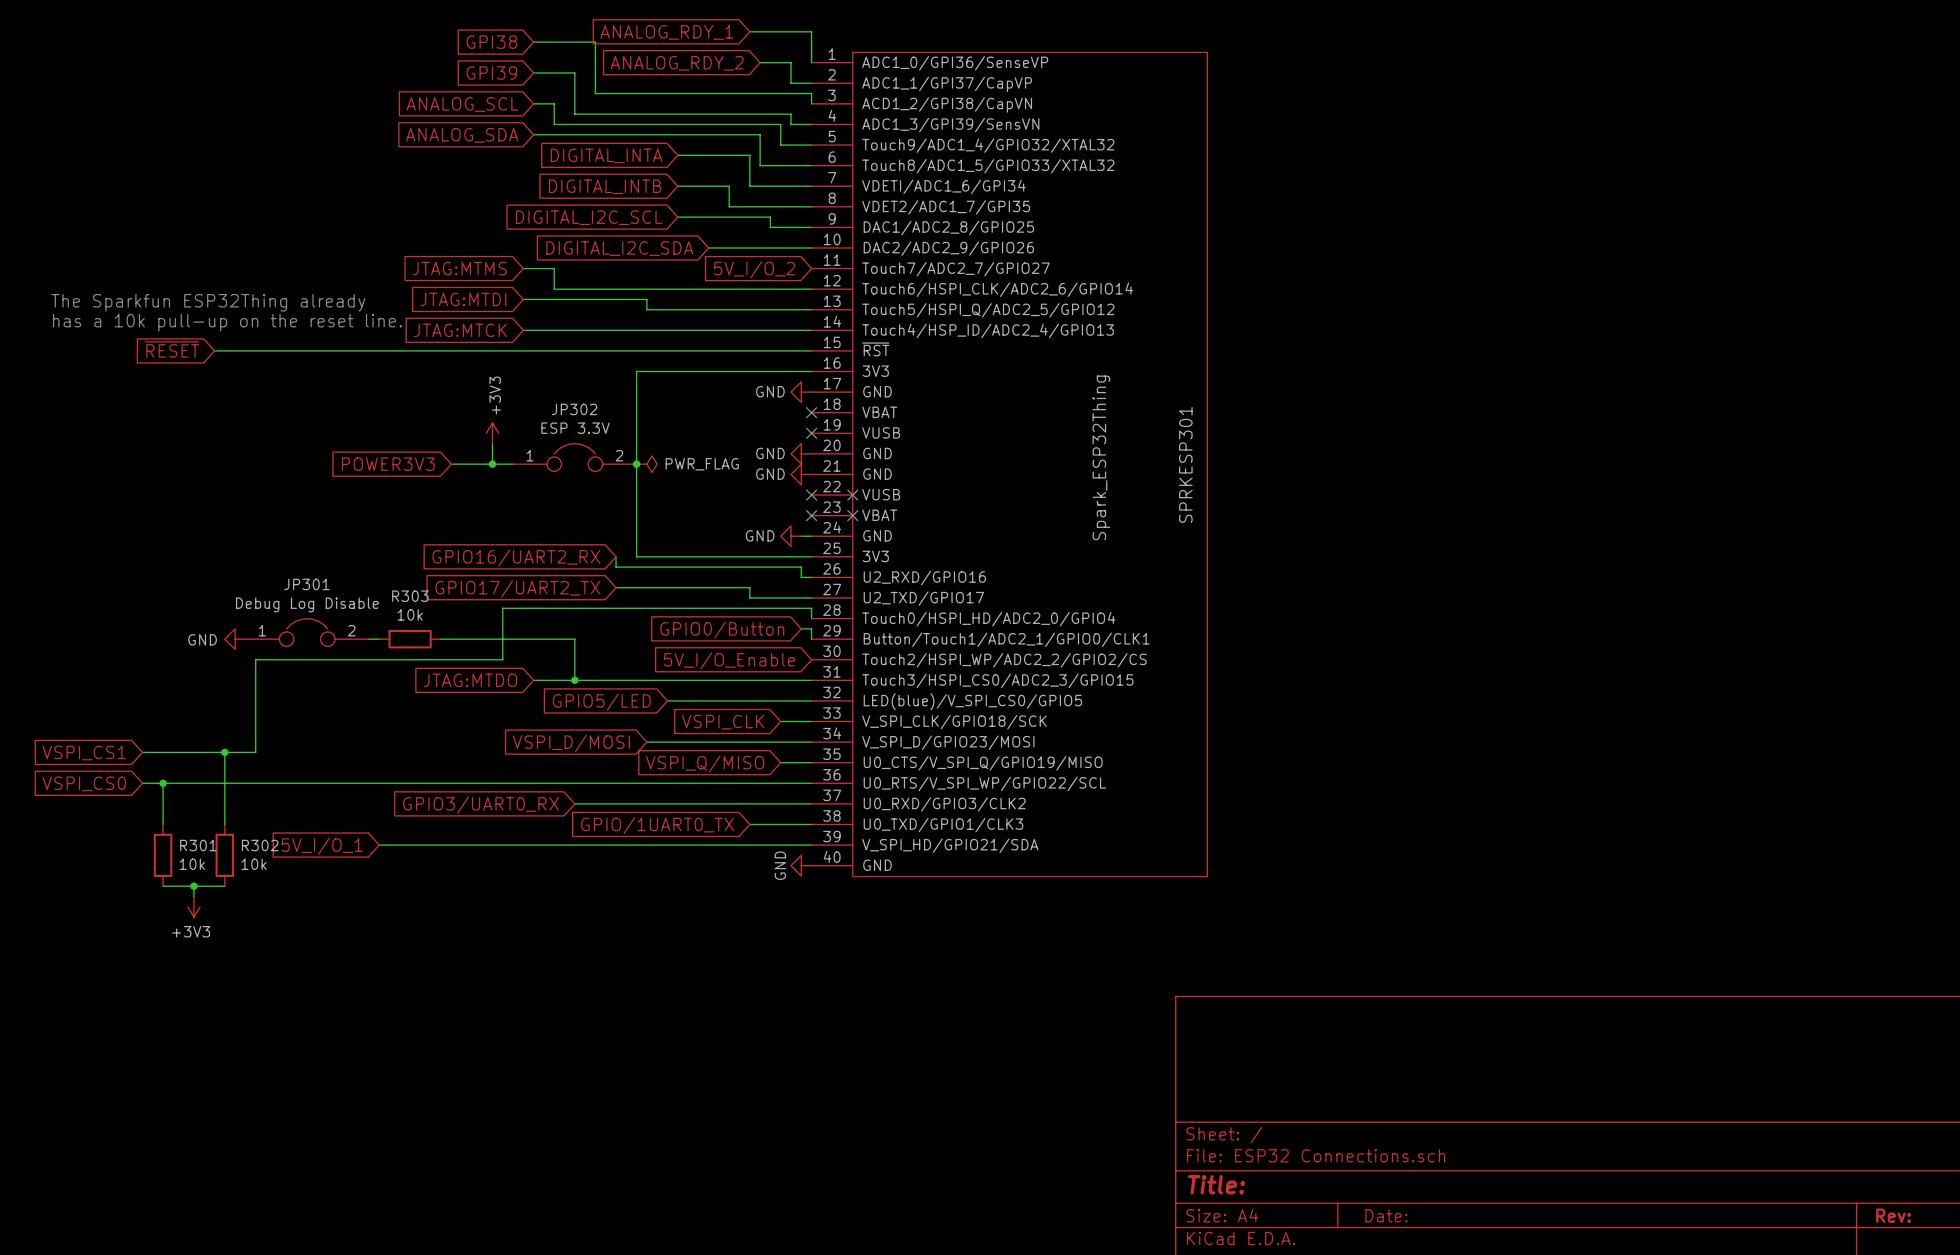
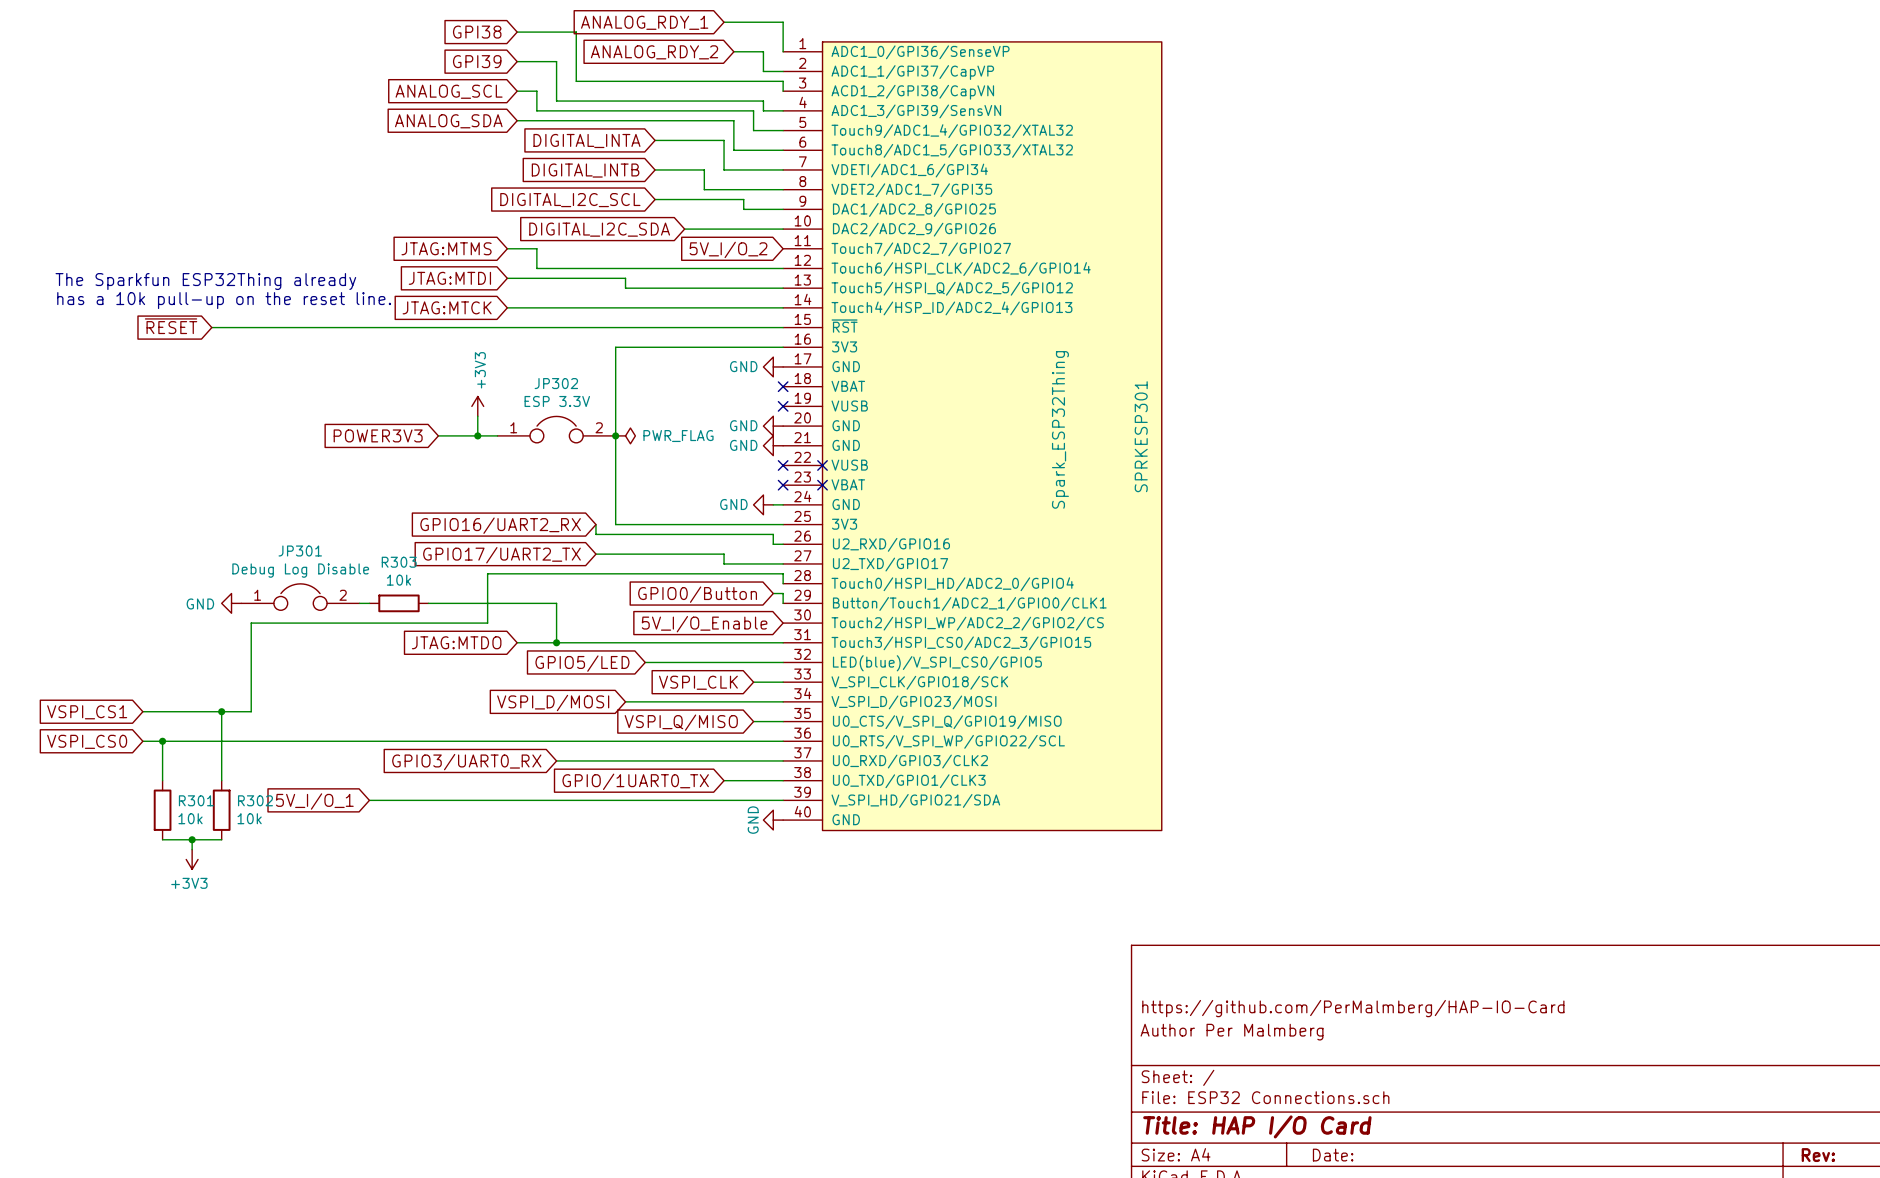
title block: none -> https://github.com/PerMalmberg/HAP-IO-Card (1353, 1008)
title block: none -> Author Per Malmberg (1232, 1032)
title block: Title: (1216, 1184) -> Title: HAP I/O Card (1257, 1126)

